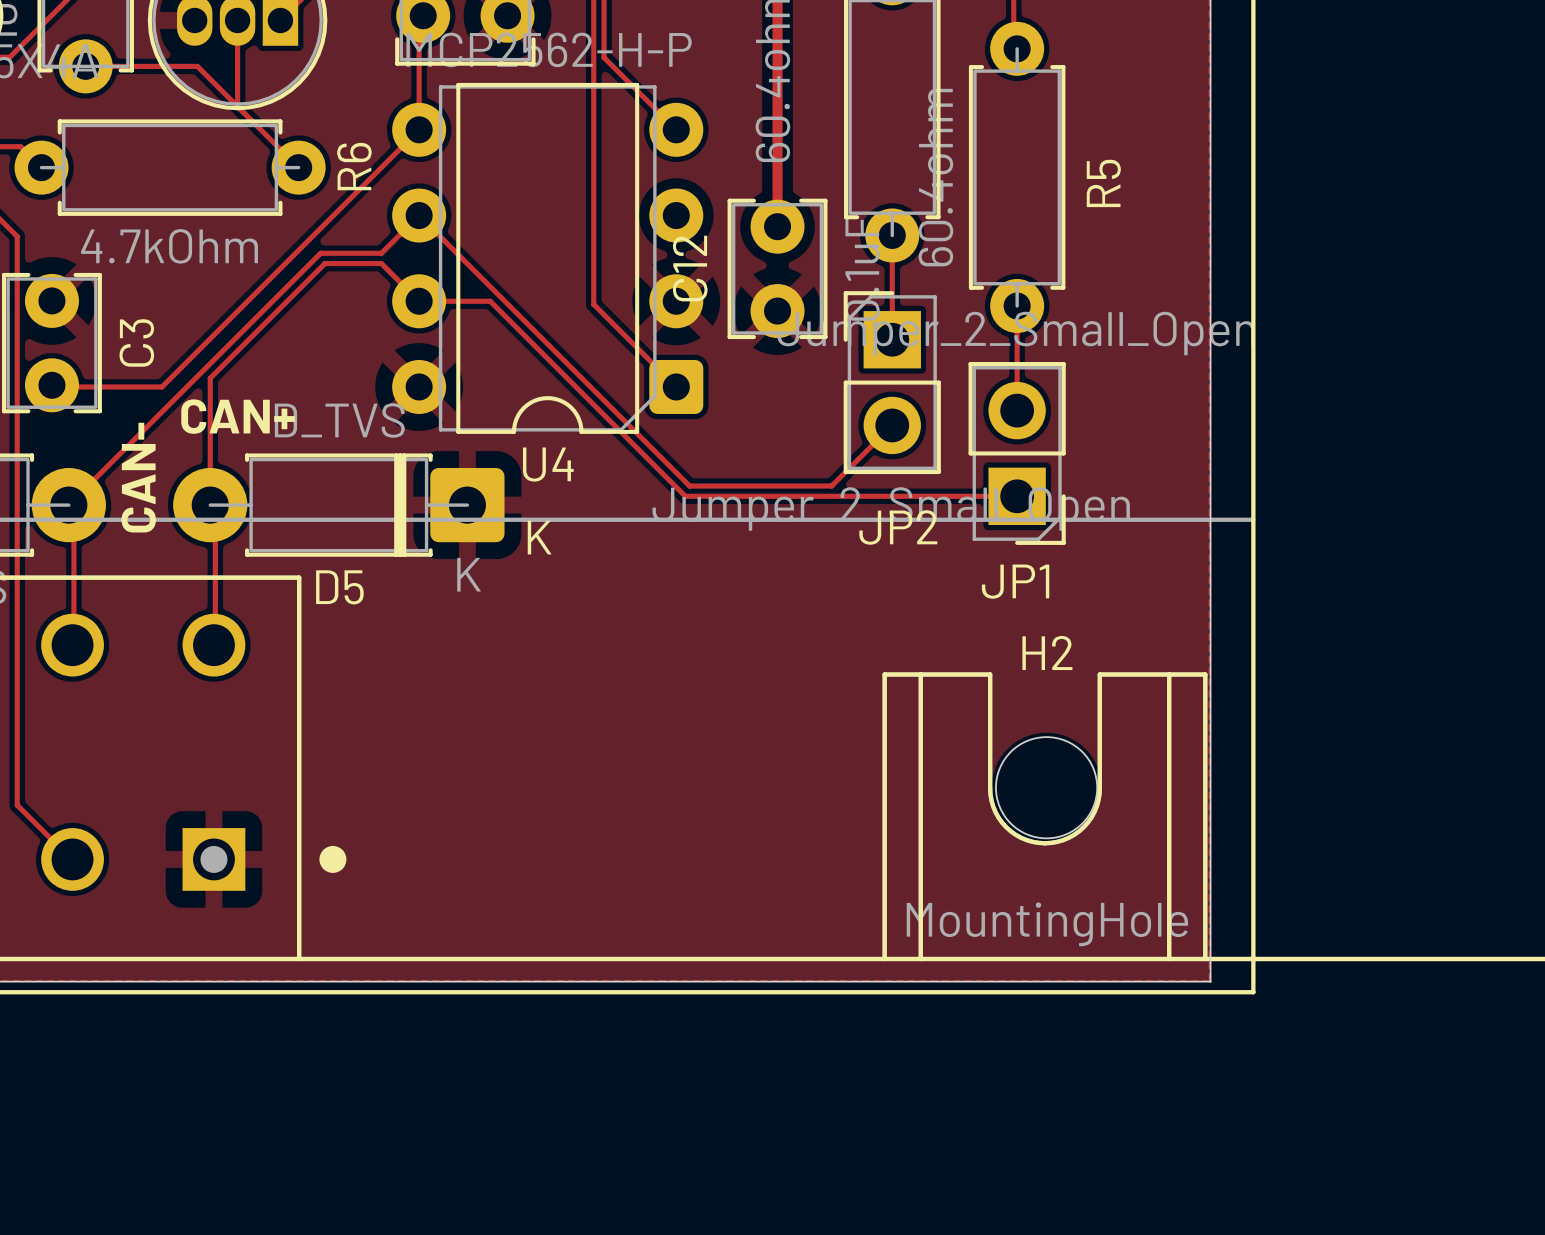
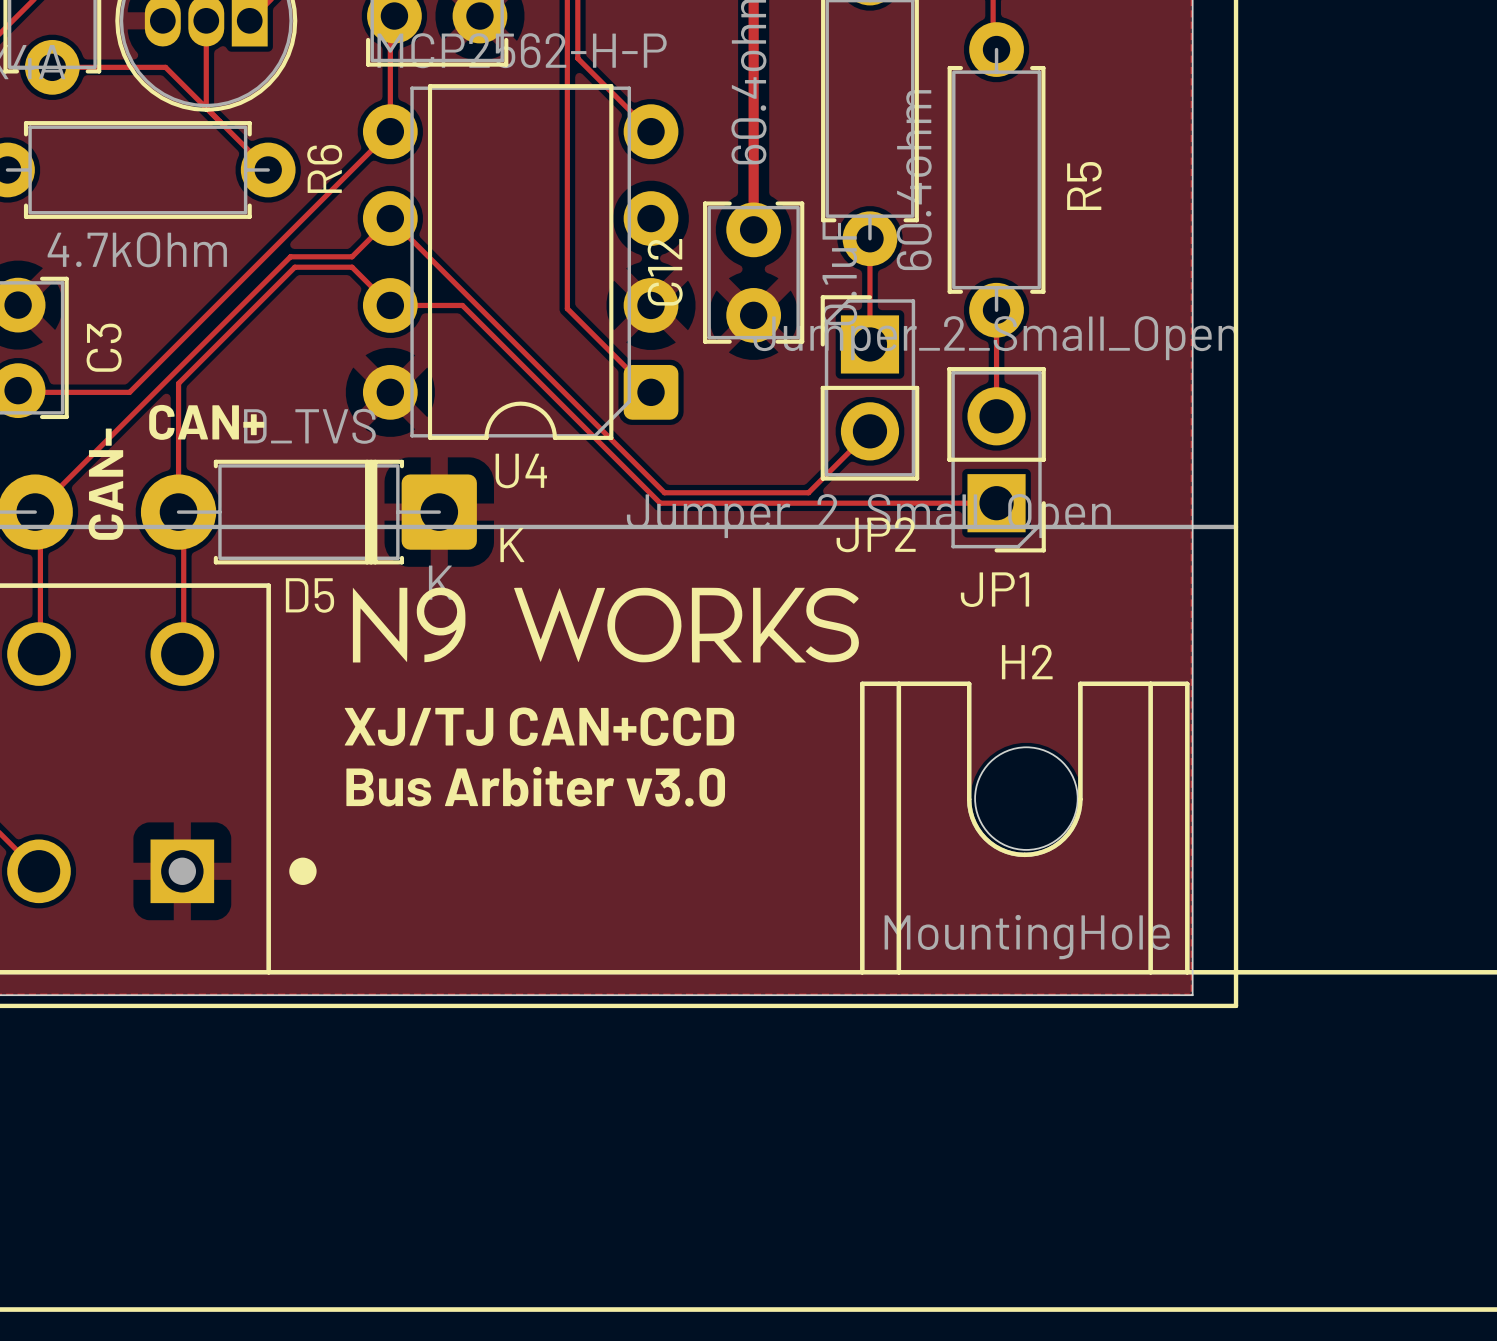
drawing: none -> [352, 587, 859, 663]
text: none -> XJ/TJ CAN+CCD (539, 726)
text: none -> Bus Arbiter v3.0 (535, 786)

